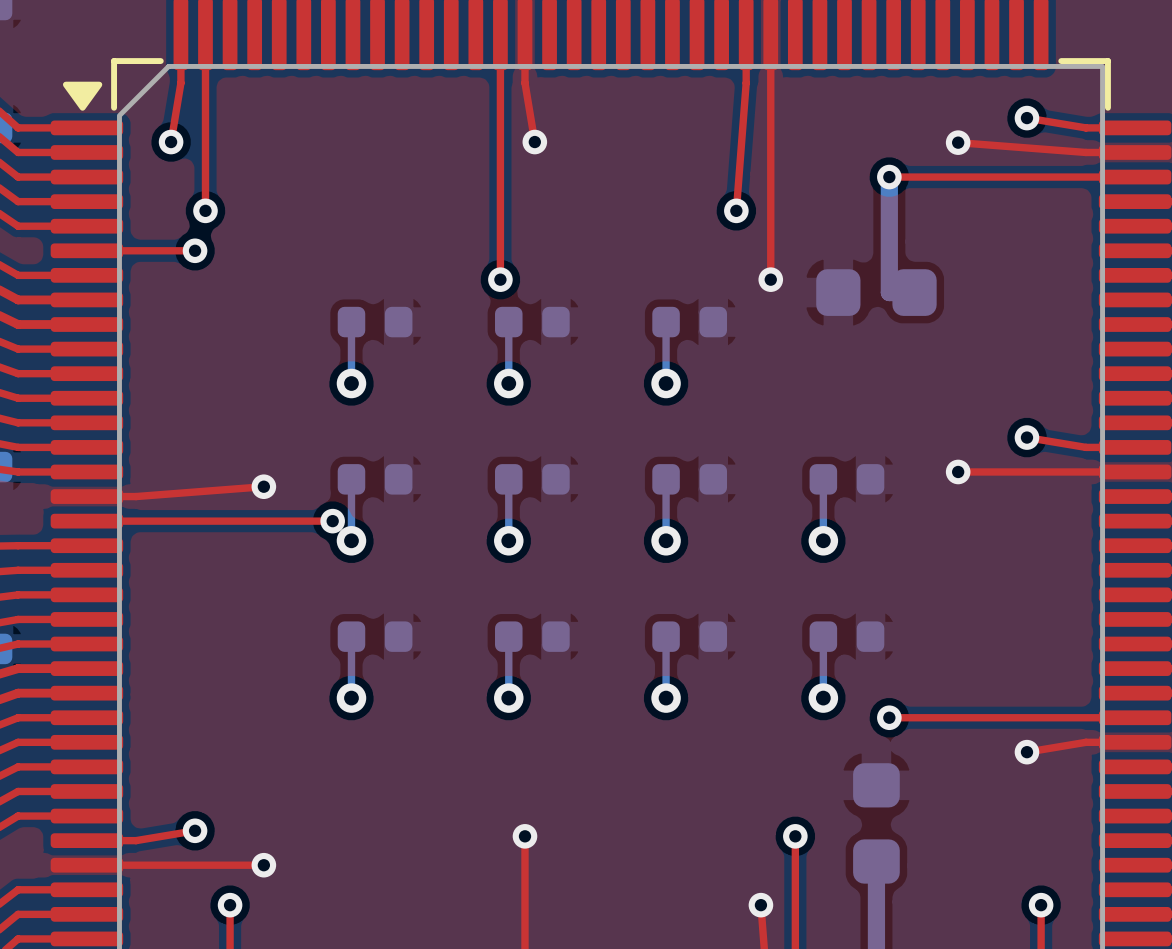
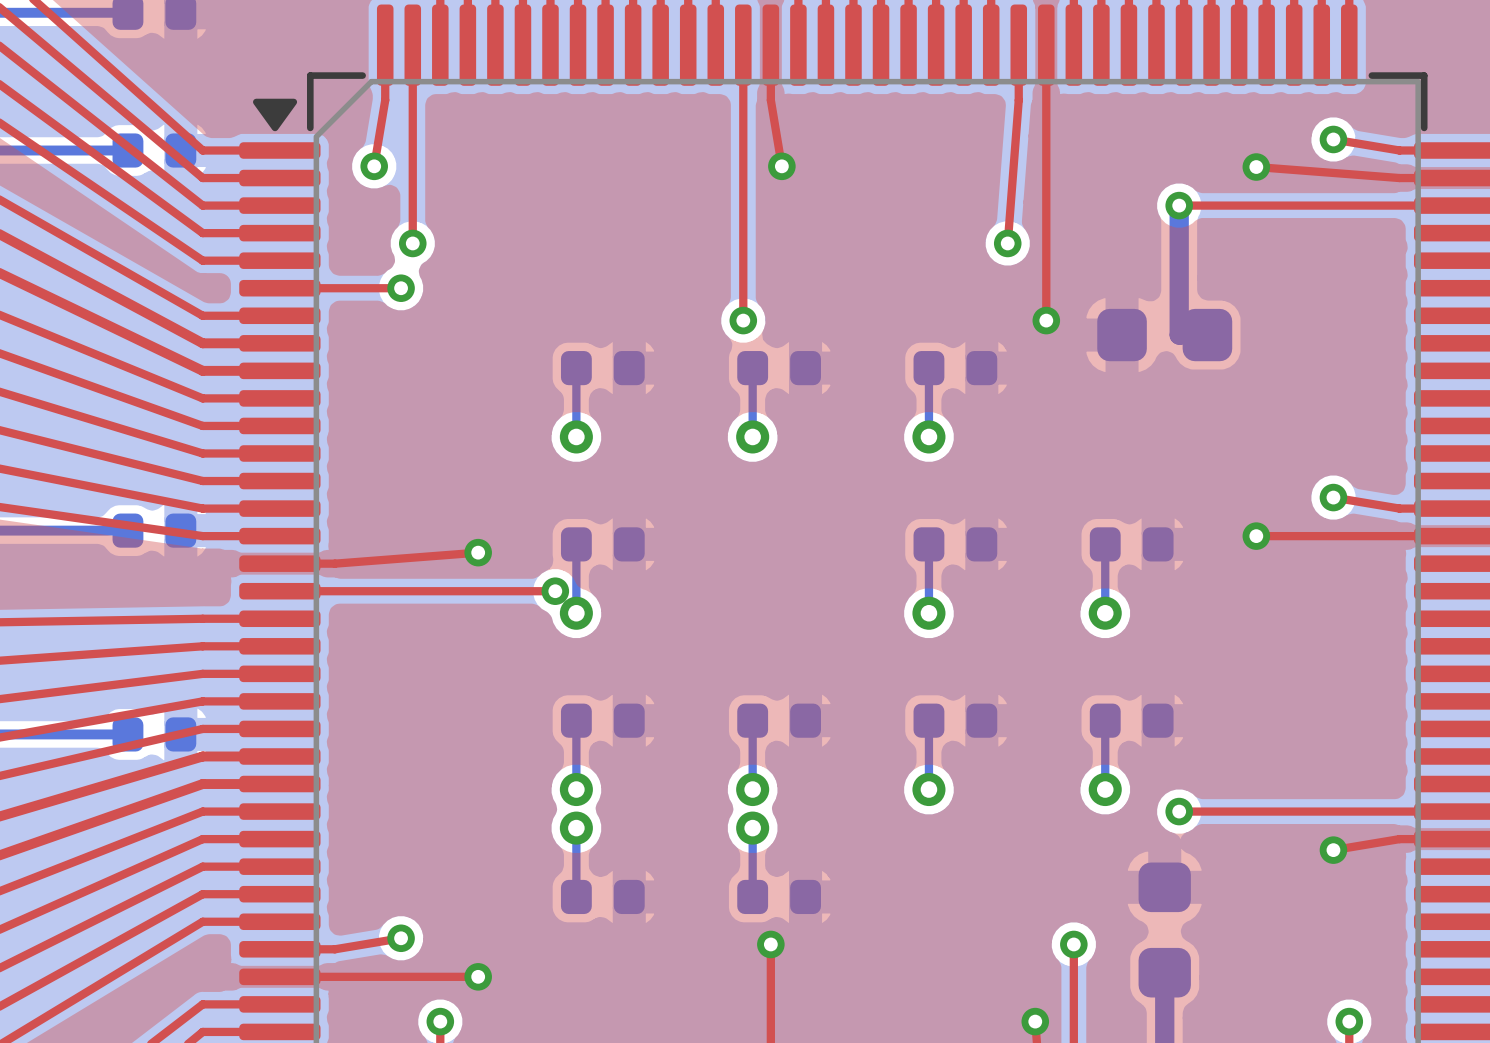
bottom track: (508, 479) (508, 540) -> (752, 828) (752, 896)
part: (532, 479) -> none
via: (508, 540) -> none
bottom track: none -> (576, 828) (576, 896)
via: none -> (576, 828)
via: none -> (752, 828)
part: none -> (602, 896)
part: none -> (779, 896)

